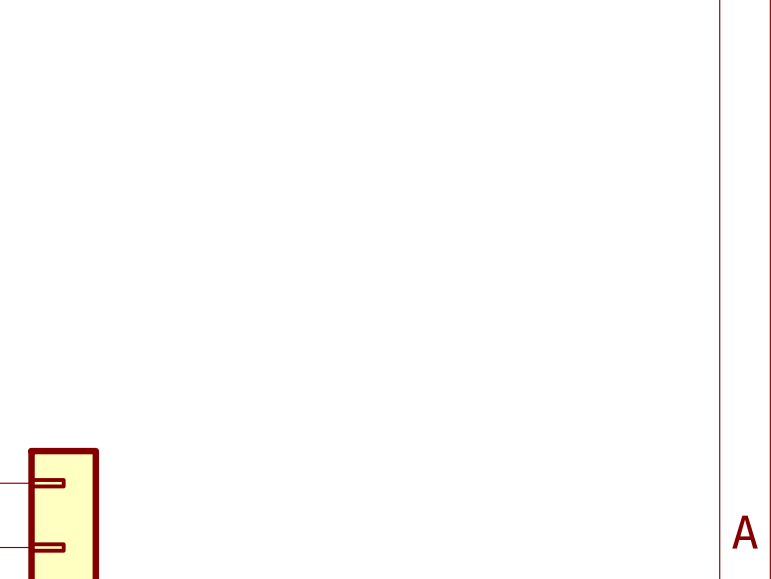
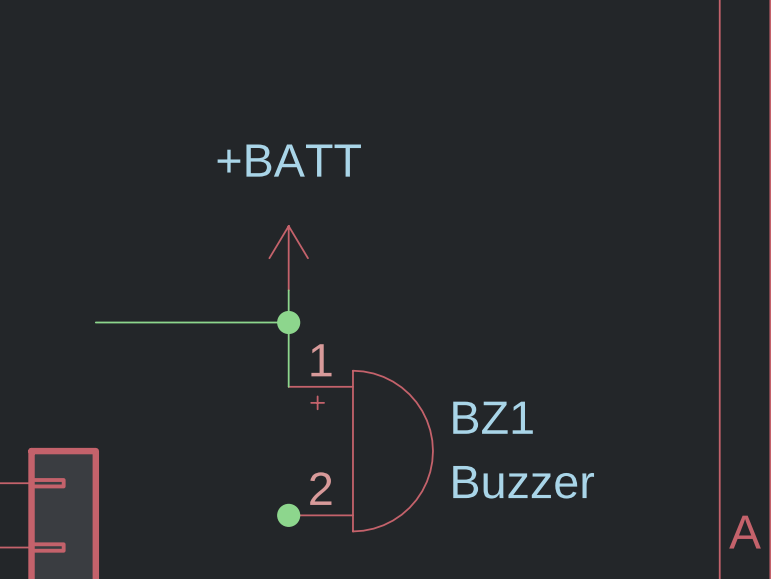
power symbol: none -> +BATT (288, 258)
wire: none -> (288, 290) (288, 386)
wire: none -> (95, 322) (288, 322)
junction: none -> (288, 322)
BZ1: none -> Buzzer (360, 451)
junction: none -> (288, 515)

